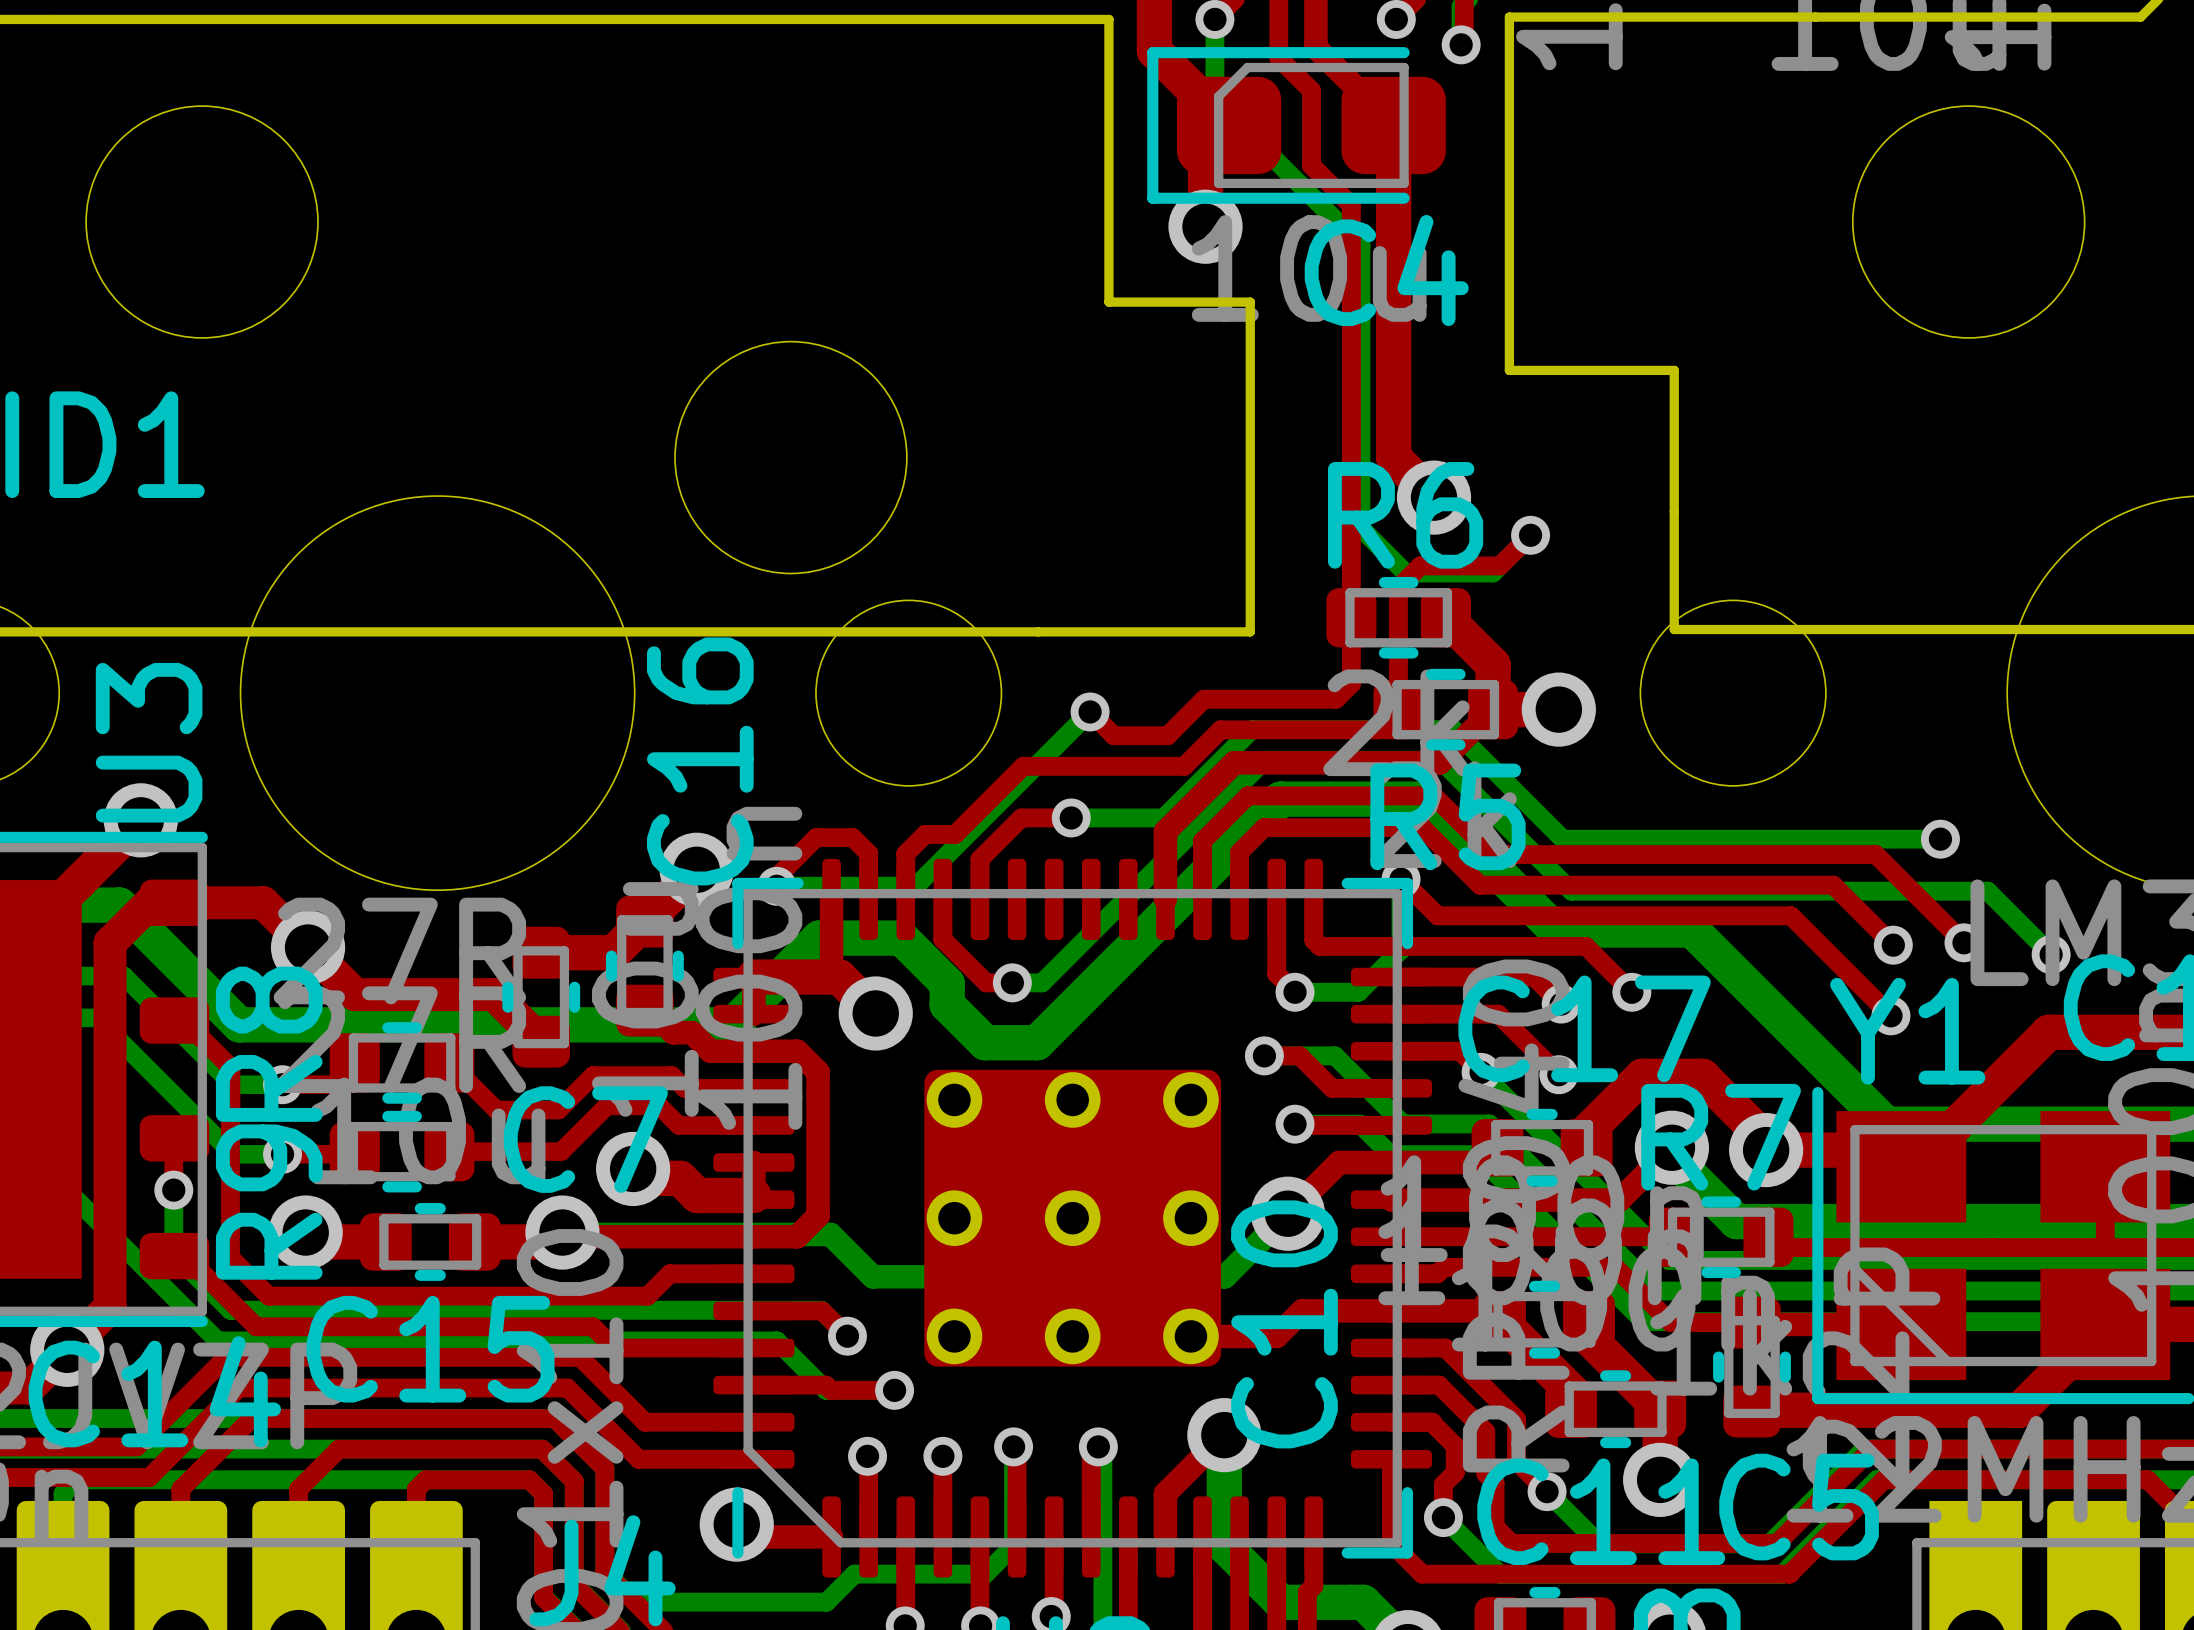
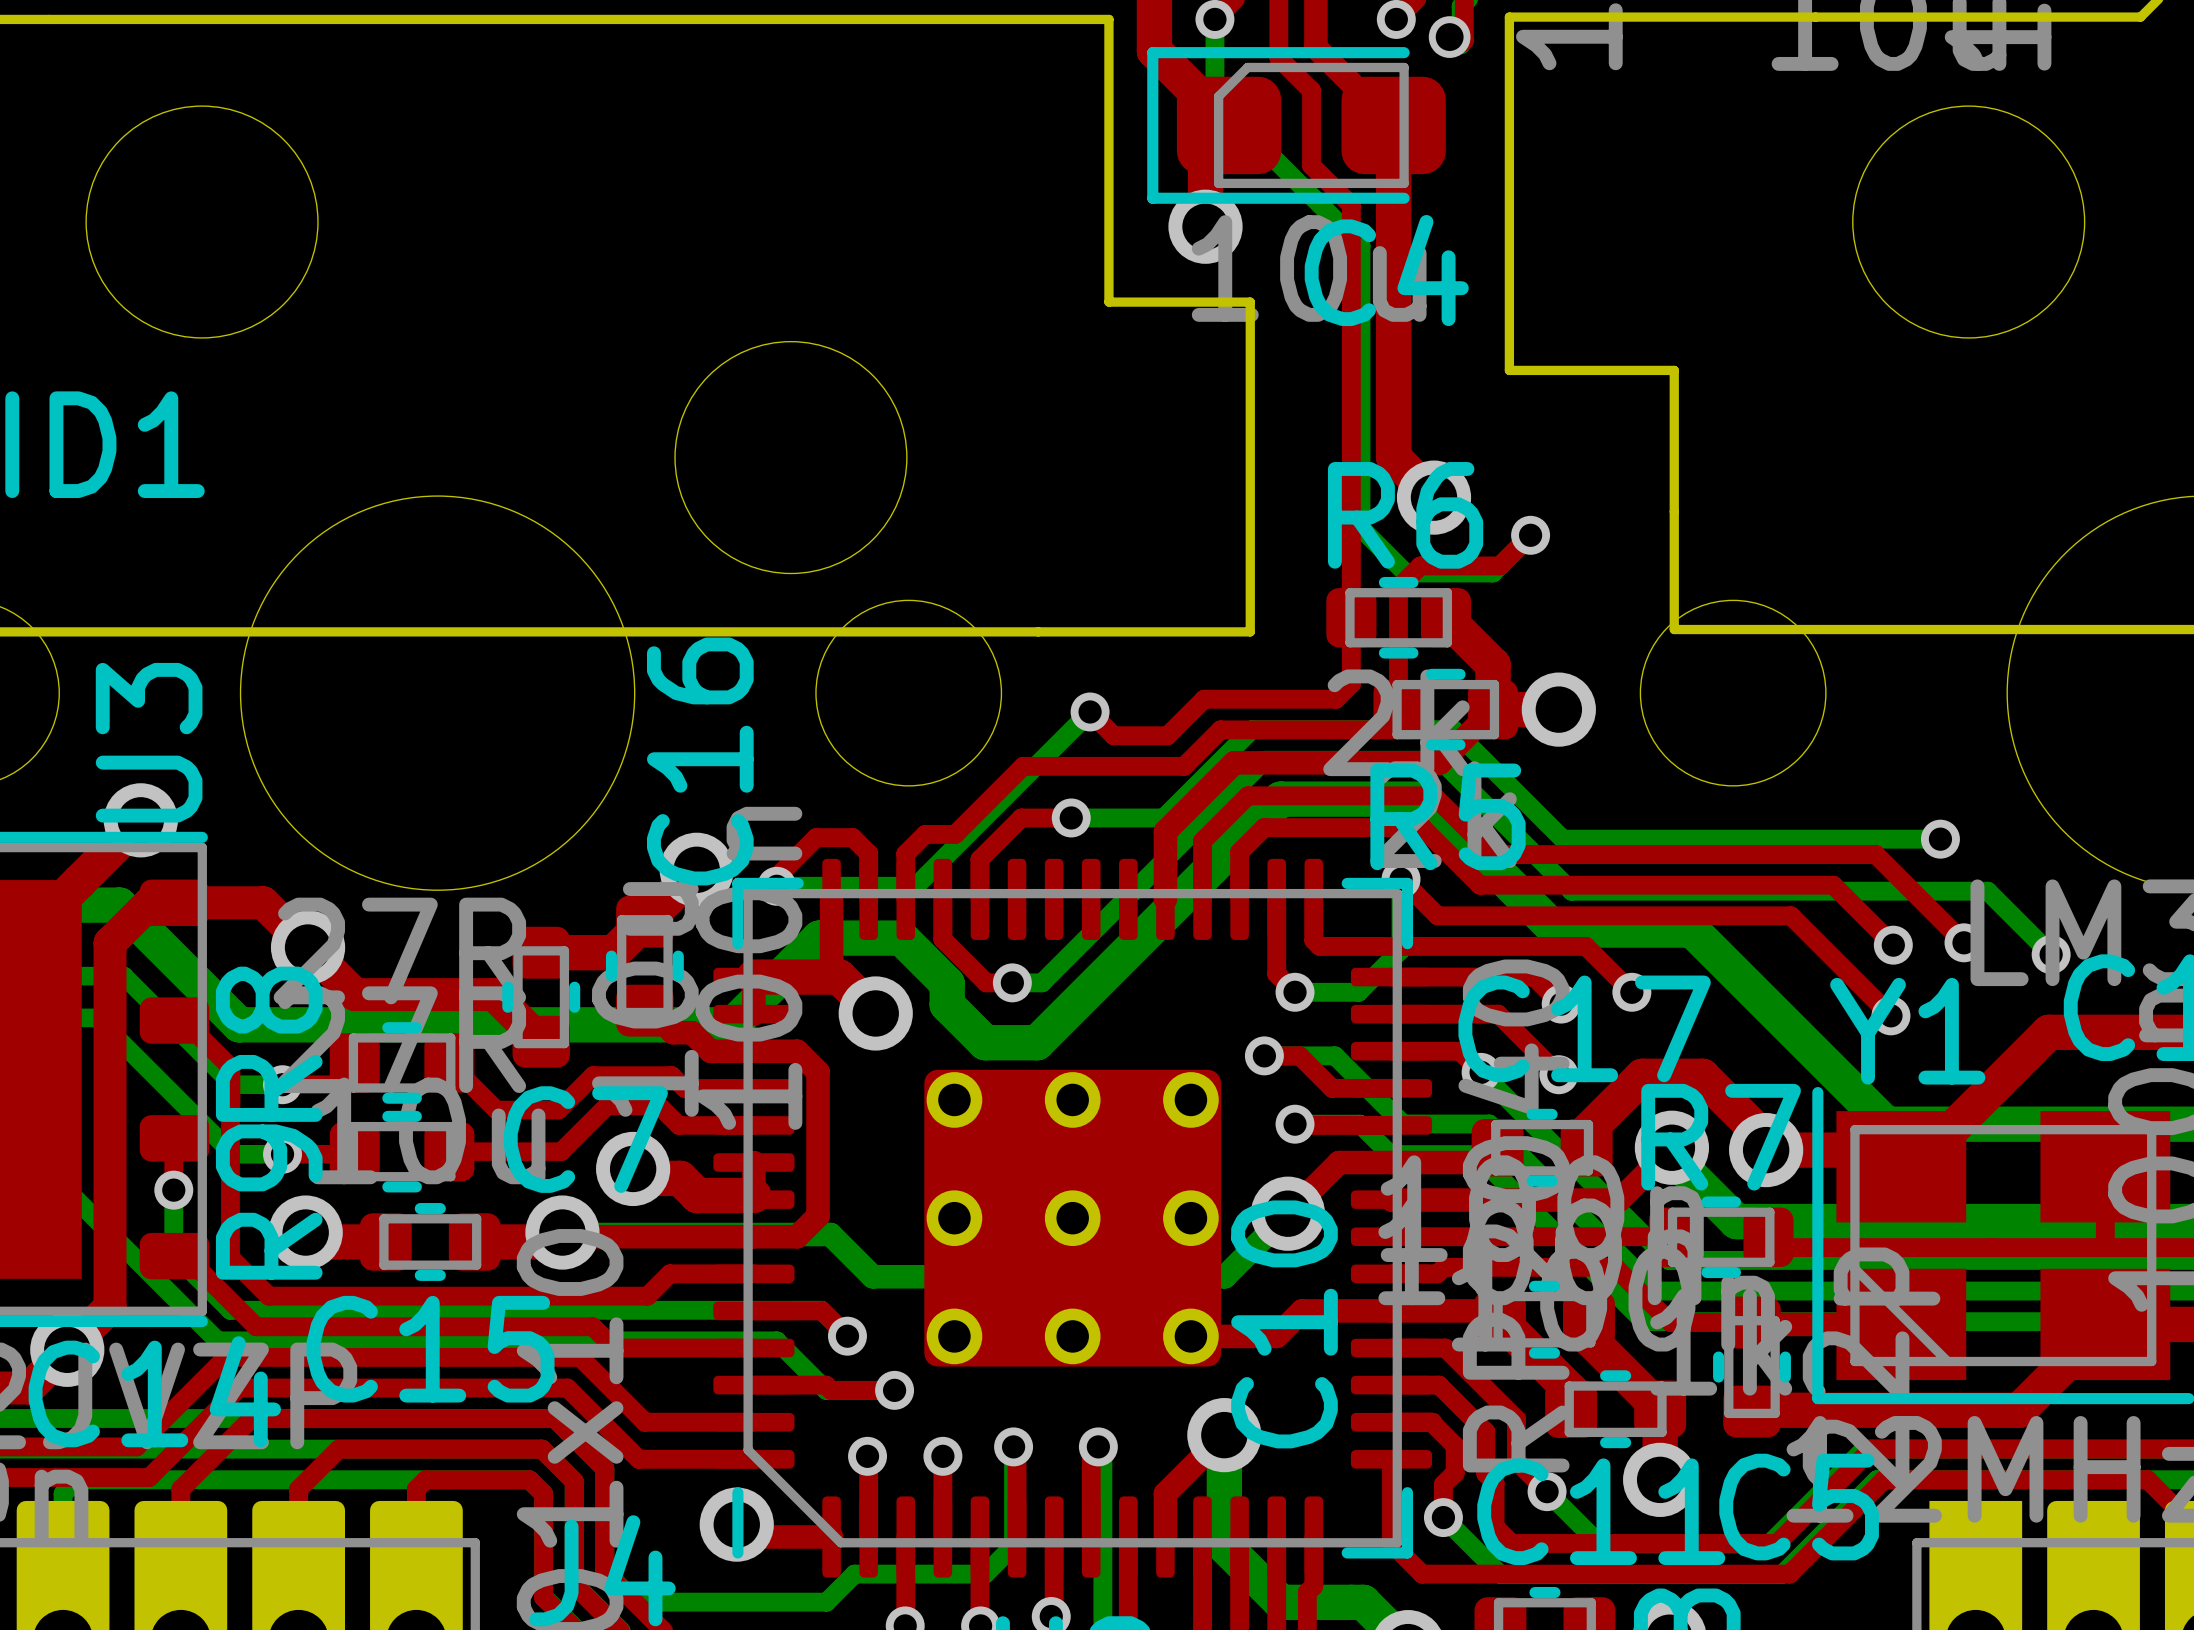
via position: (1461, 44) -> (1449, 37)

